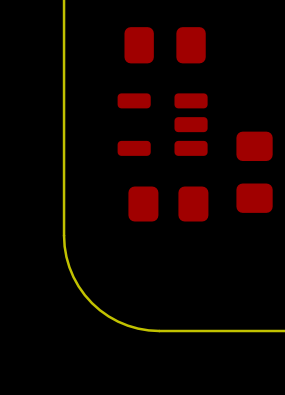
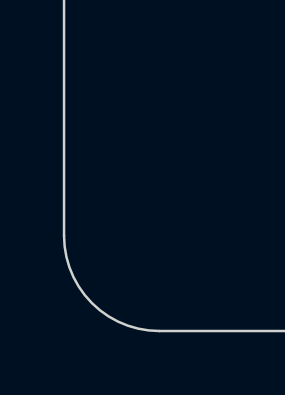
part: (165, 45) -> none
part: (162, 124) -> none
part: (254, 172) -> none
part: (168, 204) -> none

